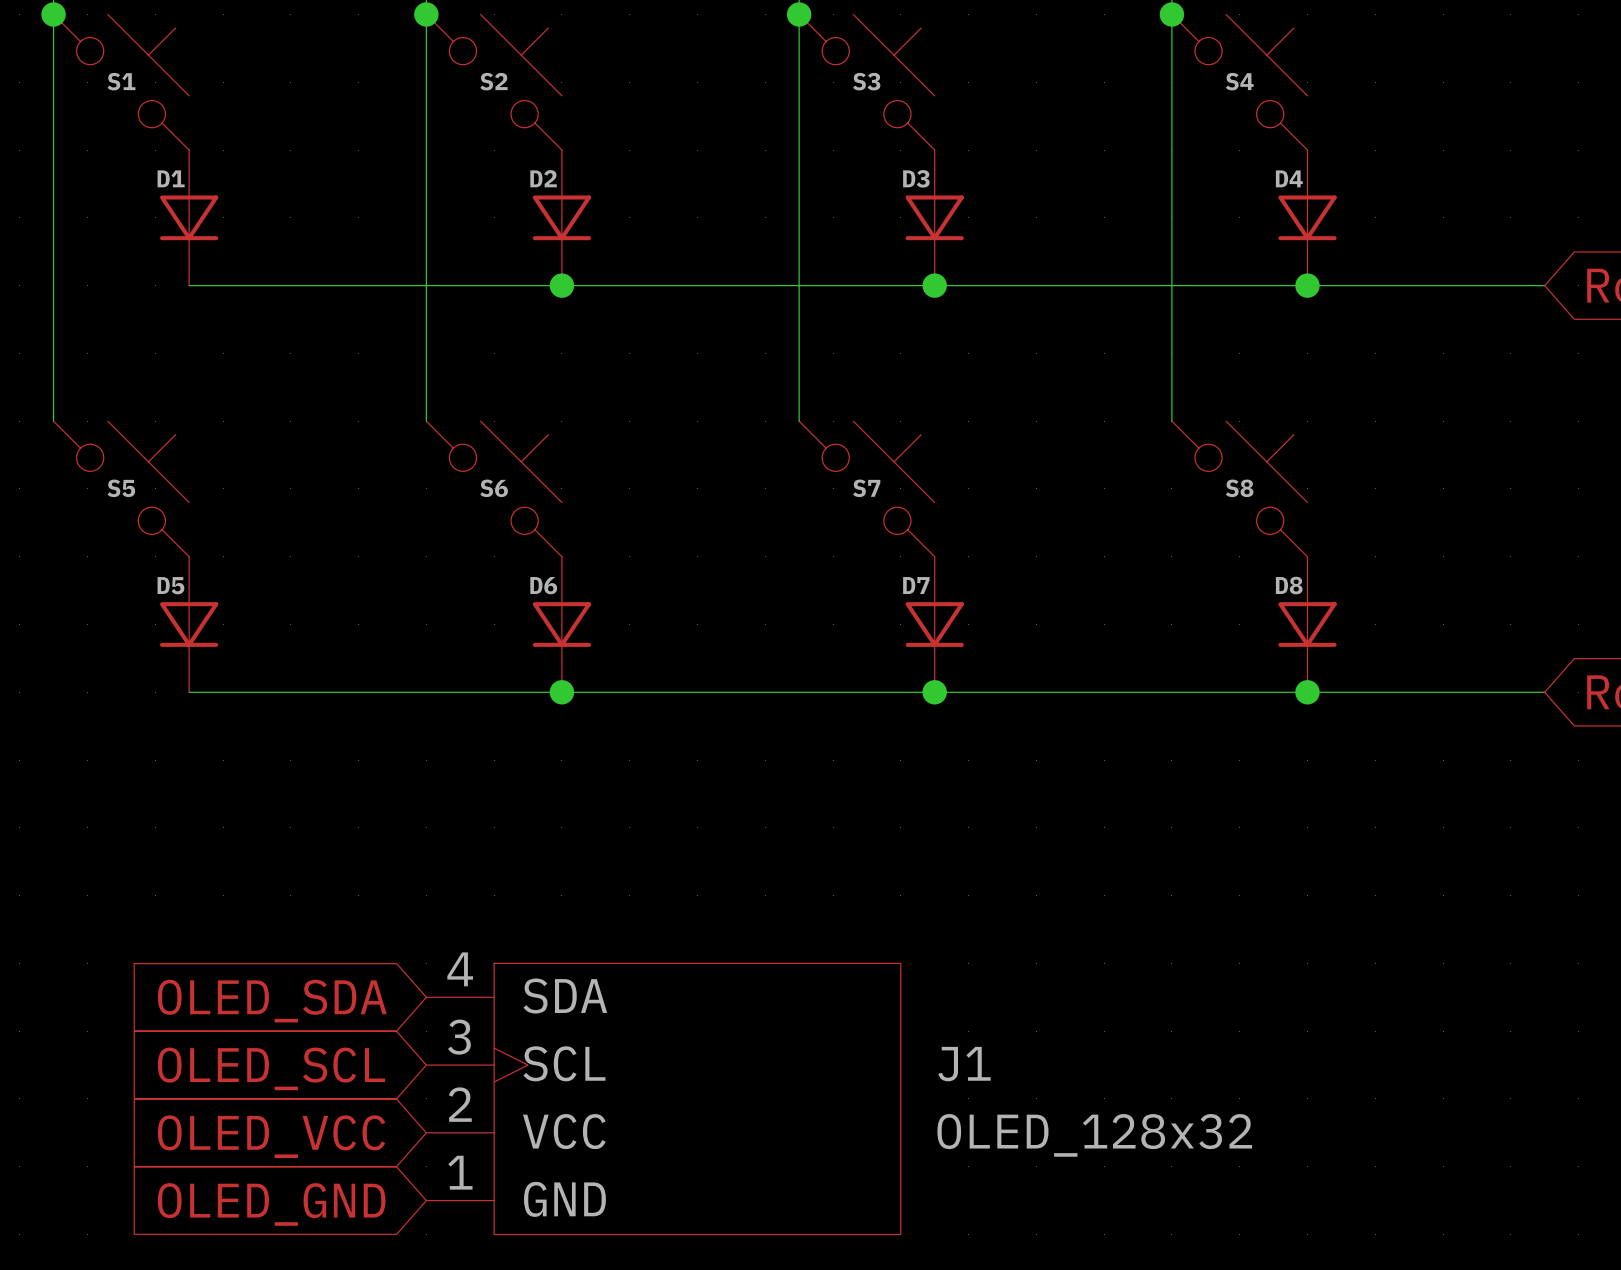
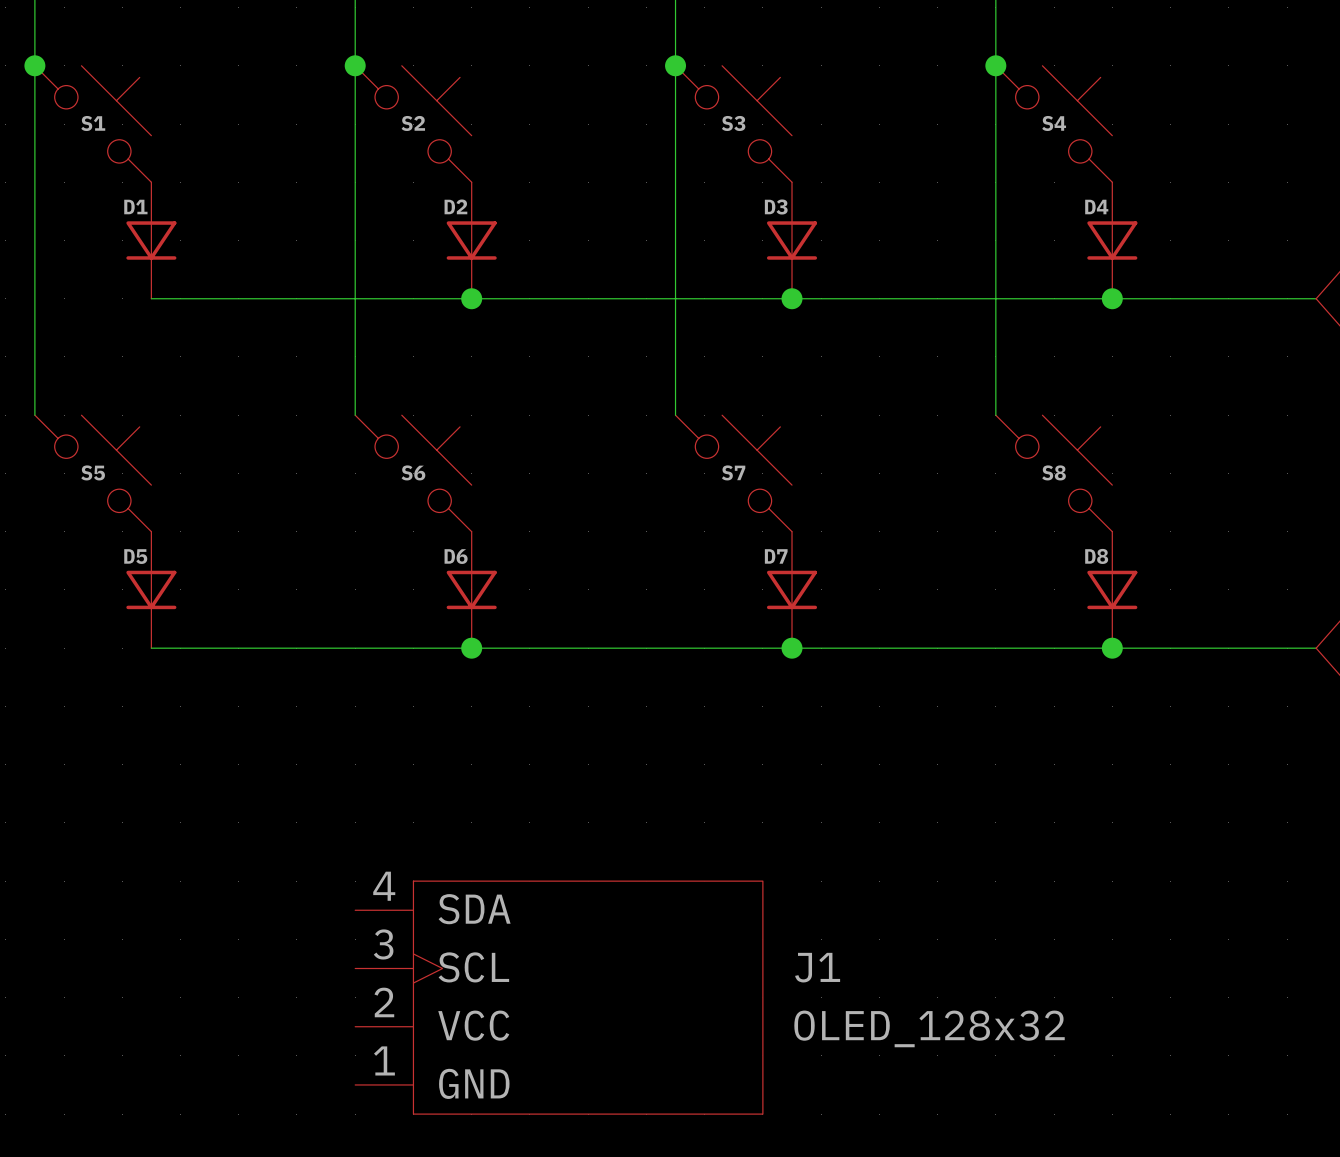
global label: OLED_SDA (272, 1001) -> none
global label: OLED_SCL (271, 1068) -> none
global label: OLED_VCC (271, 1136) -> none
global label: OLED_GND (271, 1204) -> none

